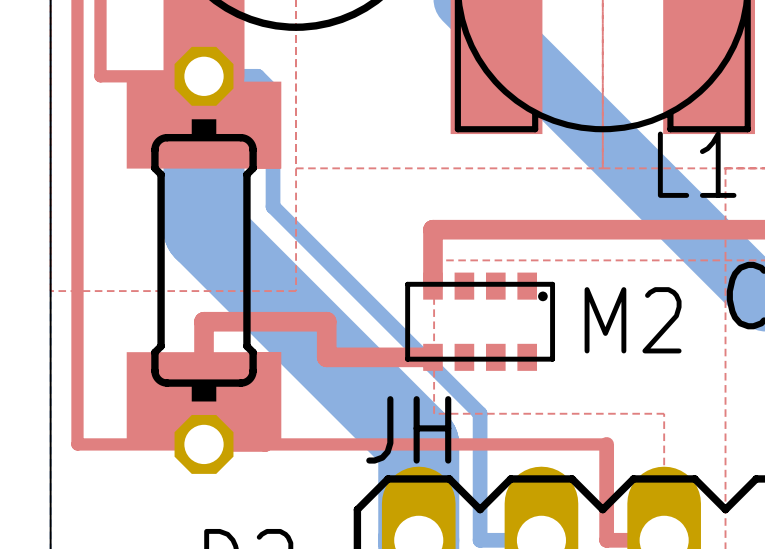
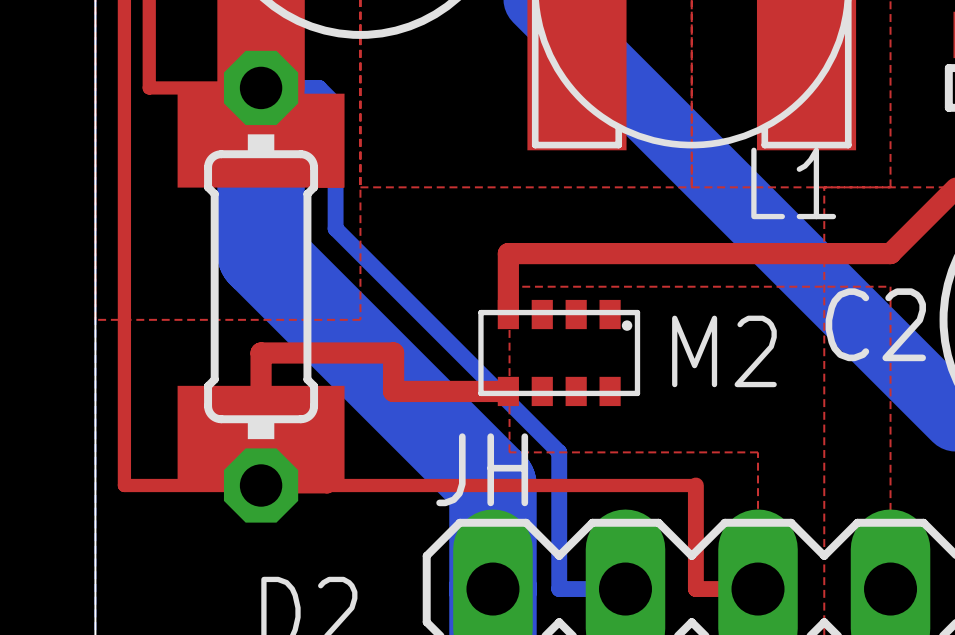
part footprint: [151, 46, 257, 474] -> [204, 50, 319, 523]

